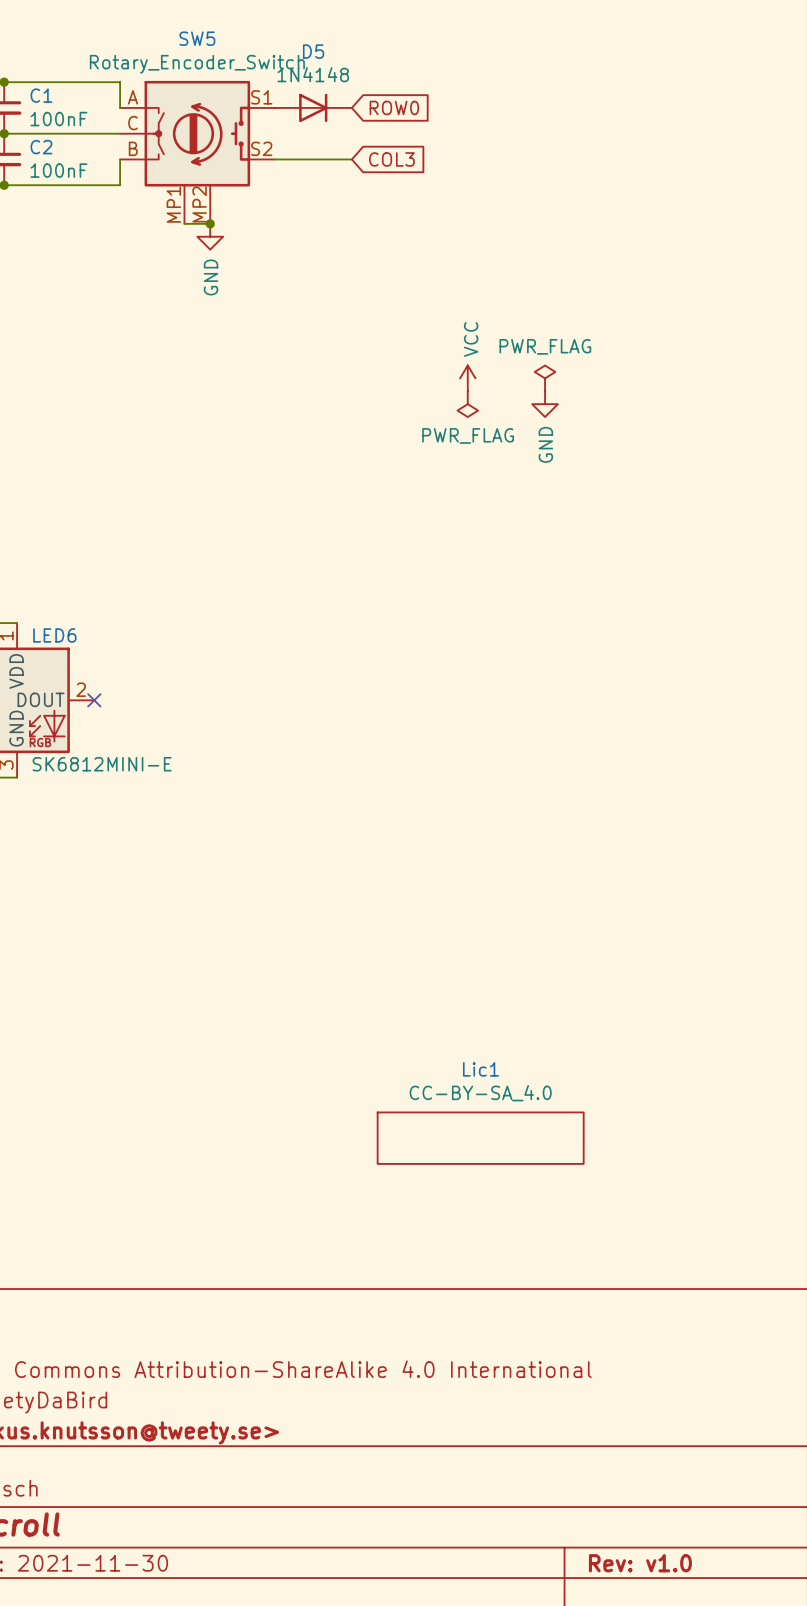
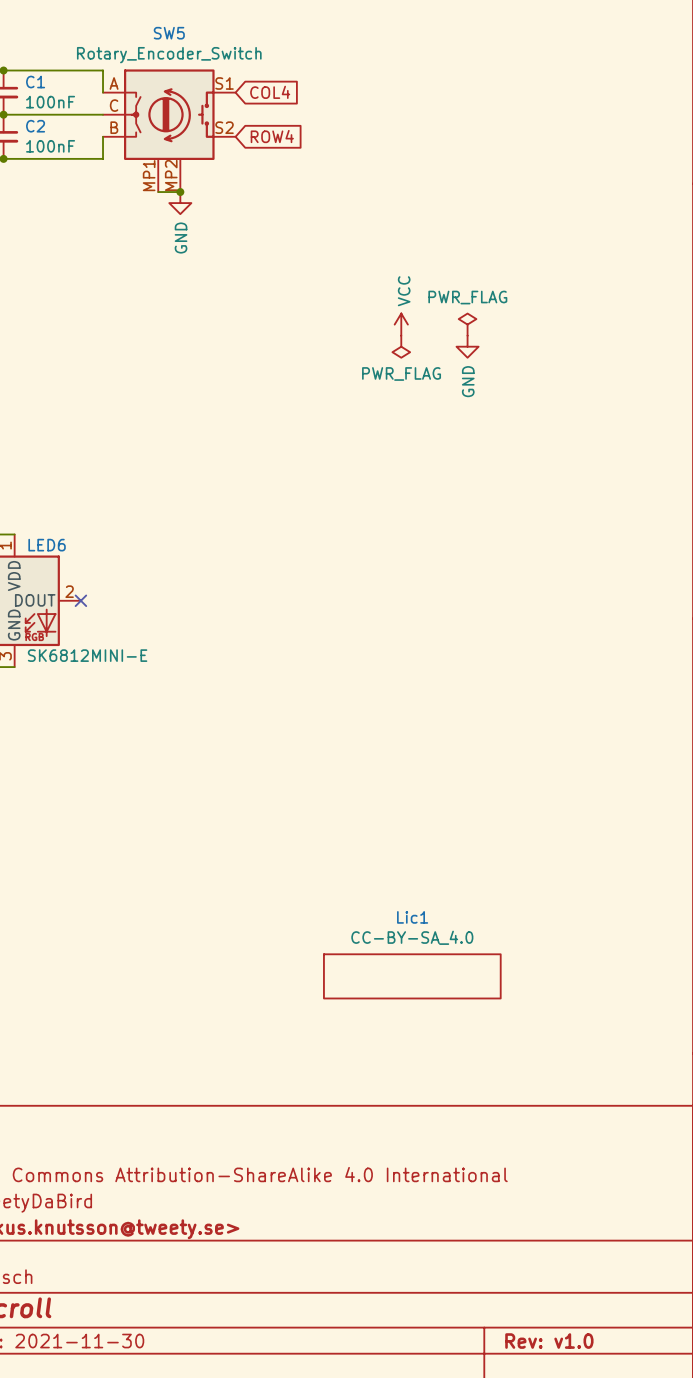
D5: 1N4148 (313, 107) -> none
global label: none -> COL4 (270, 92)
global label: ROW0 (394, 107) -> none
wire: (274, 159) (351, 159) -> none
global label: none -> ROW4 (272, 136)
global label: COL3 (391, 159) -> none

